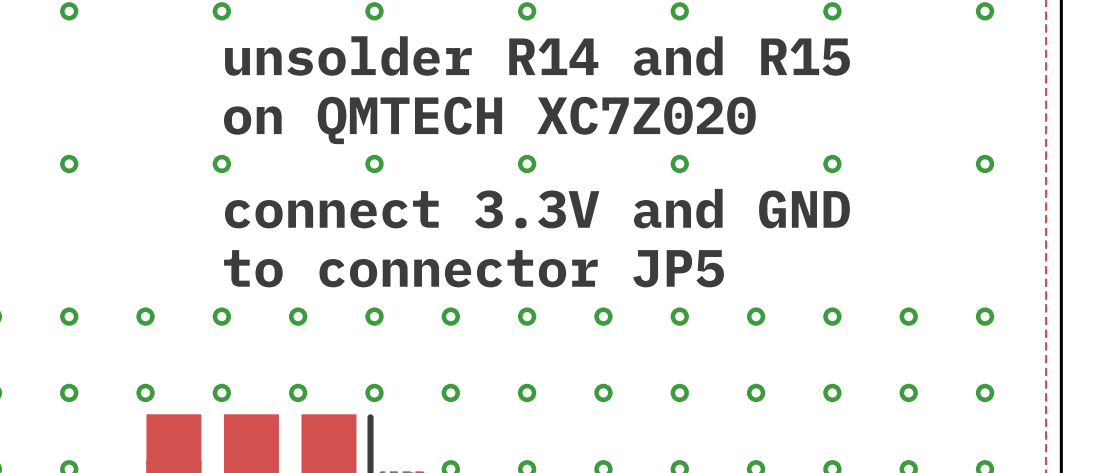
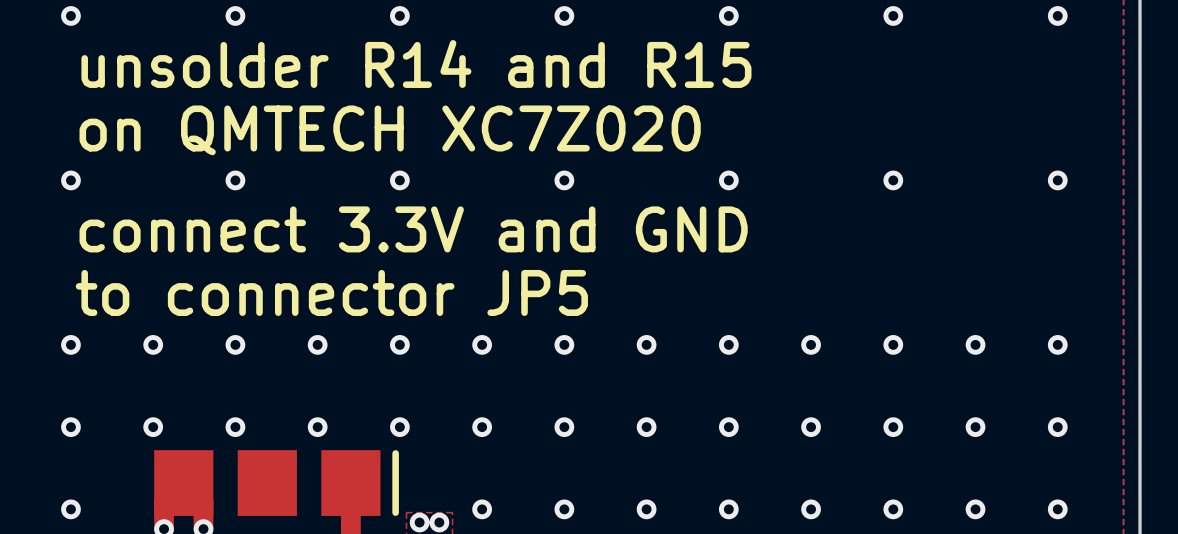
text position: unsolder R14 and R15 (537, 56) -> unsolder R14 and R15 (416, 64)
text position: on QMTECH XC7Z020 (489, 120) -> on QMTECH XC7Z020 (390, 130)
text position: connect 3.3V and GND (537, 208) -> connect 3.3V and GND (413, 229)
text position: to connector JP5 (474, 268) -> to connector JP5 (331, 292)

